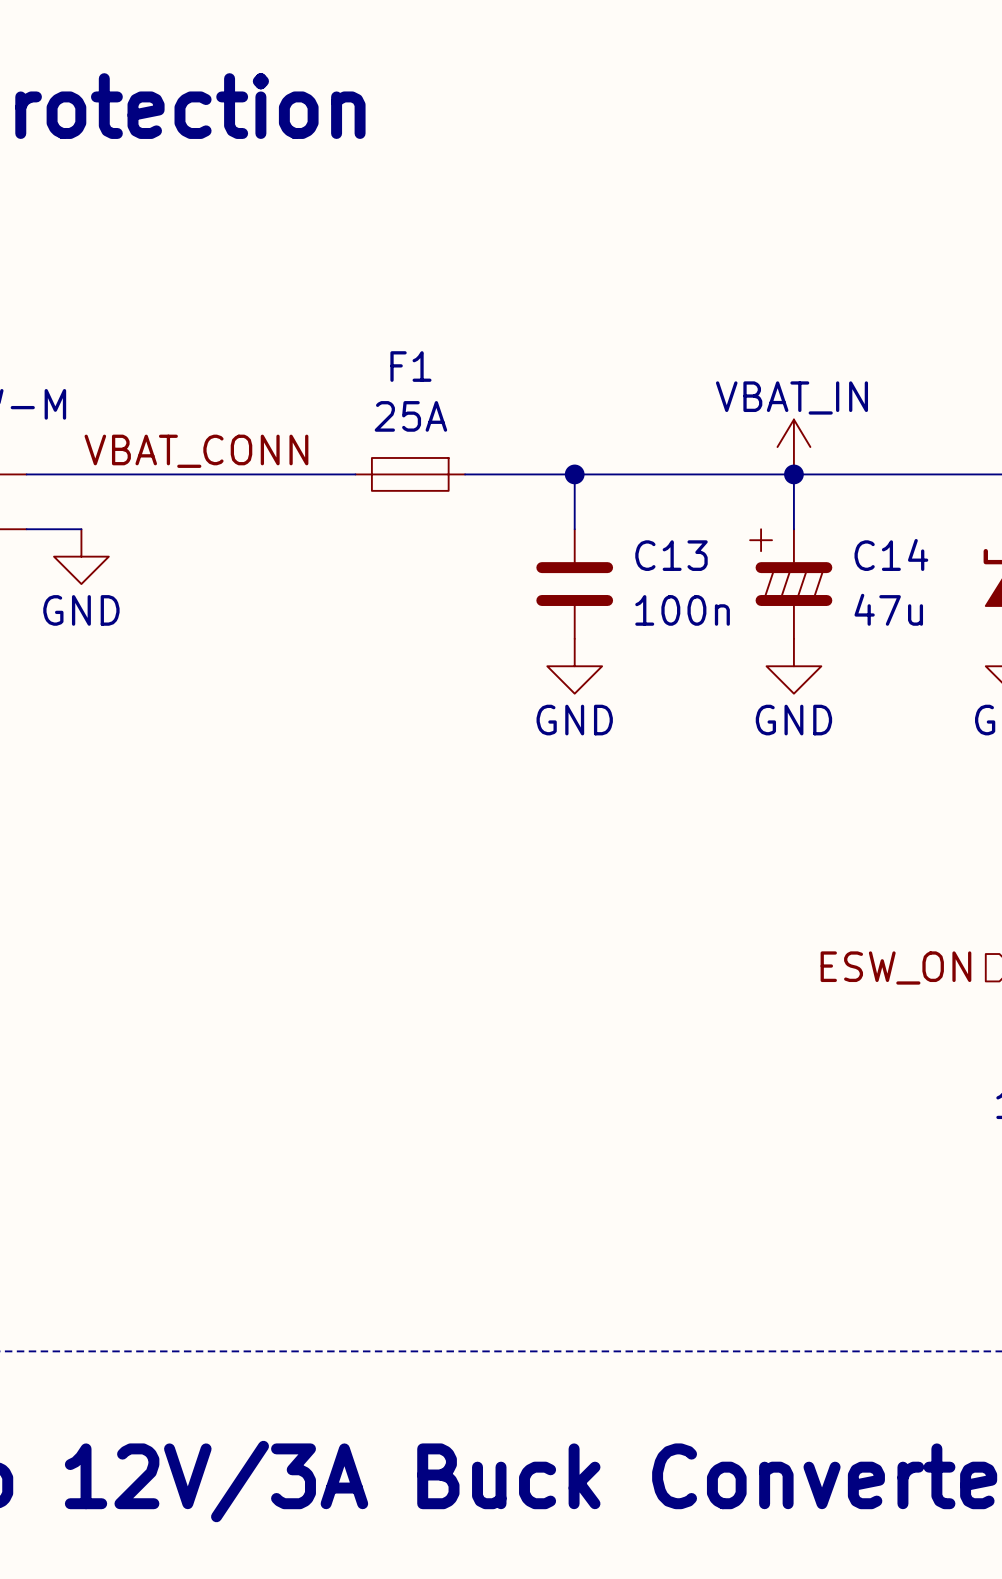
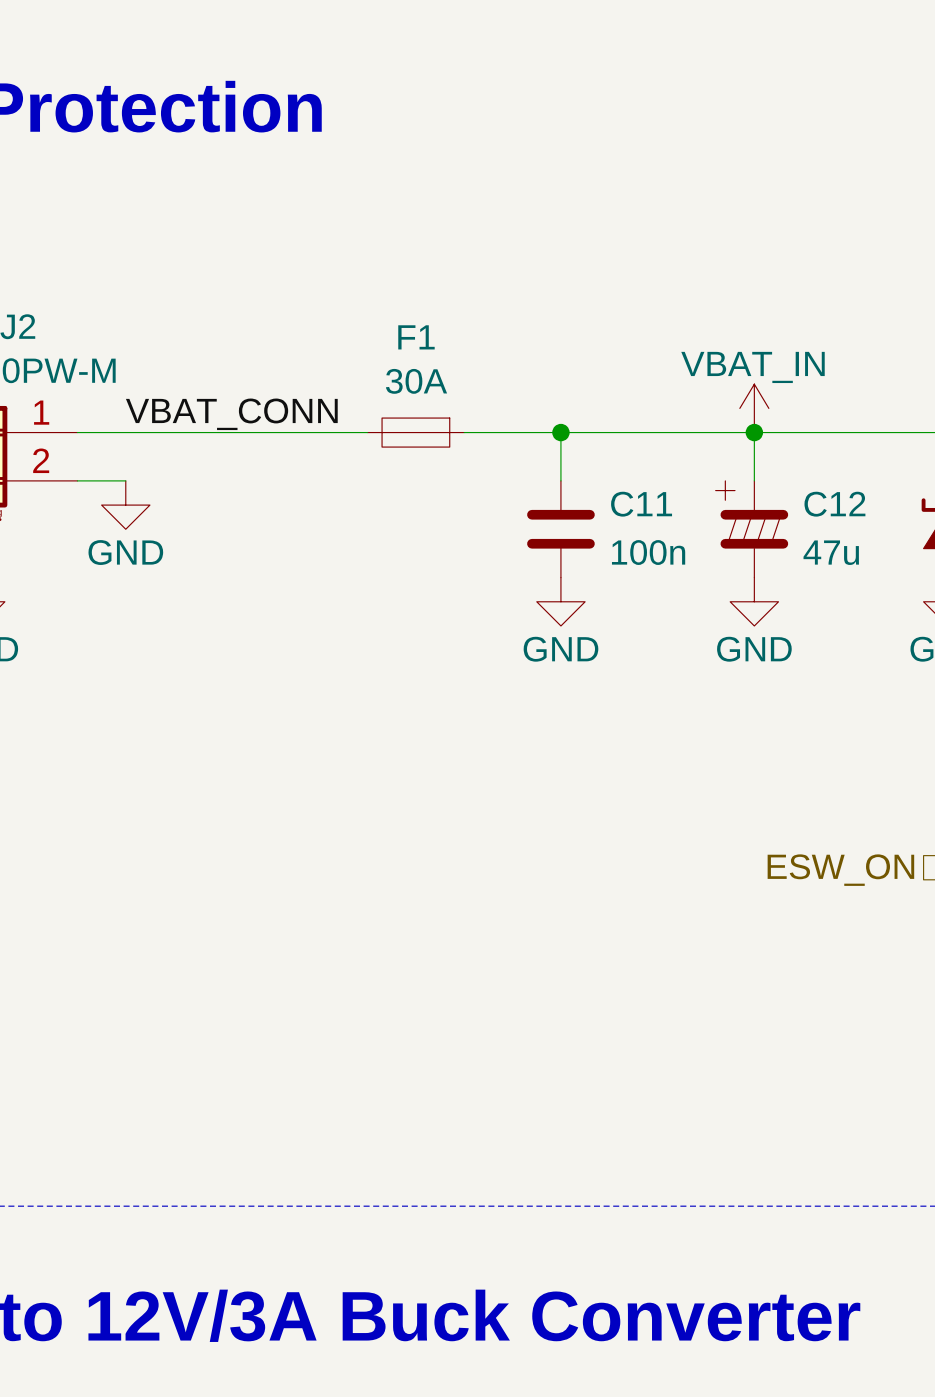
F1 value: 25A (410, 416) -> 30A (416, 381)
C14 name: C14 (891, 554) -> C12 (834, 504)
C13 name: C13 (671, 555) -> C11 (641, 504)

